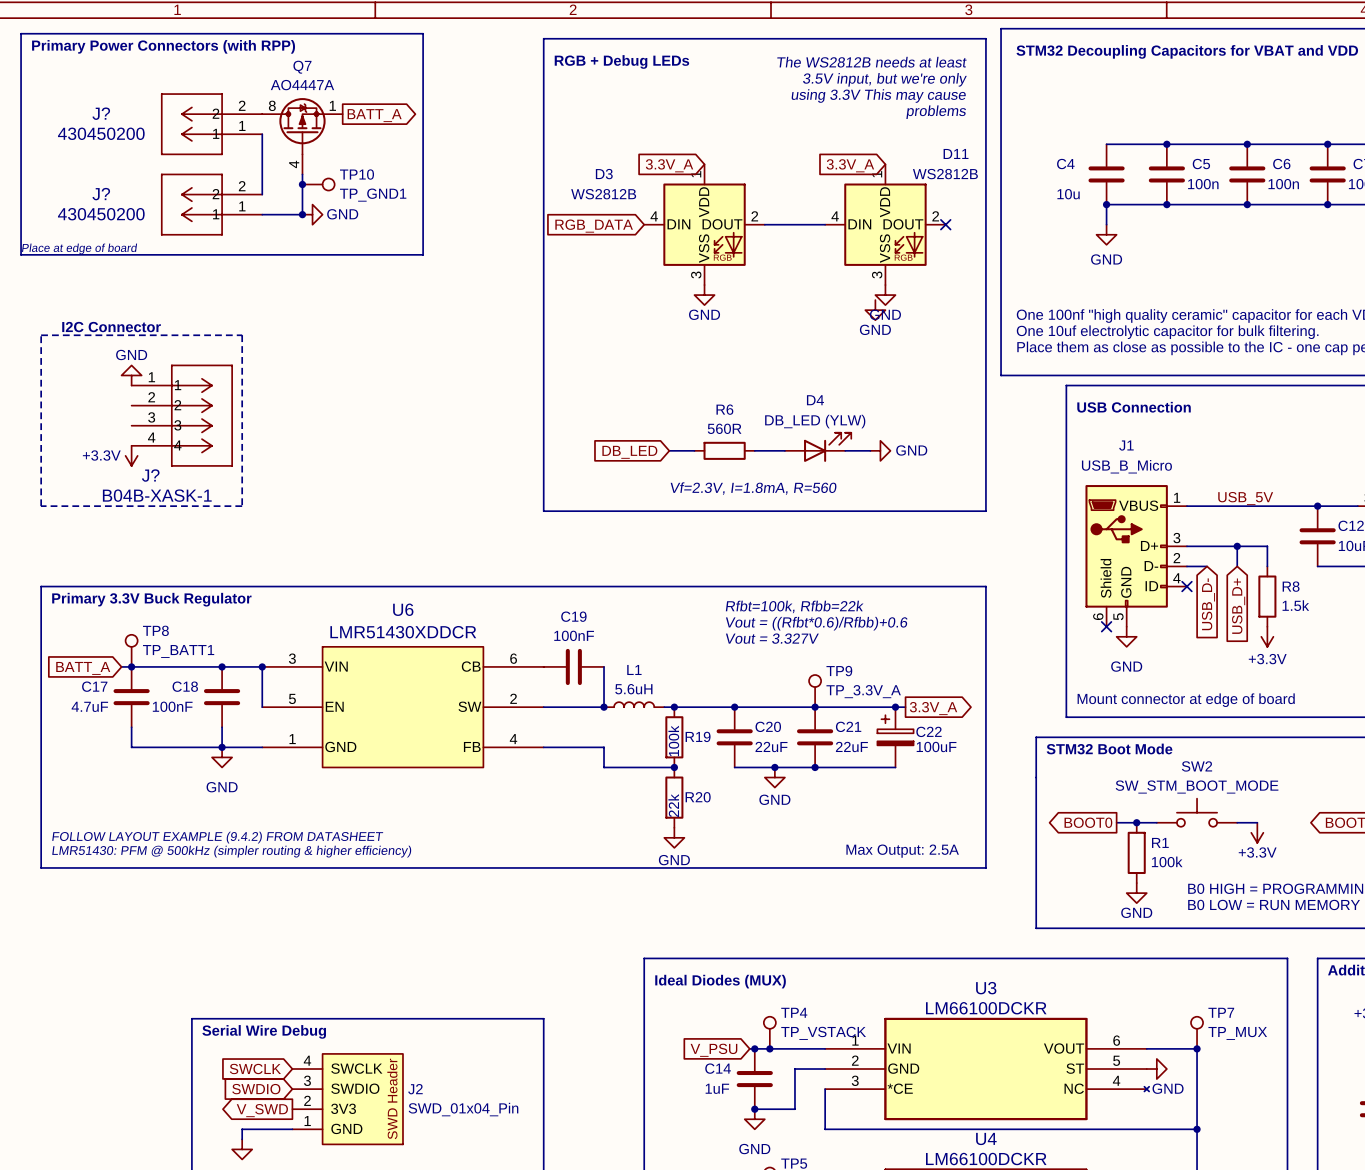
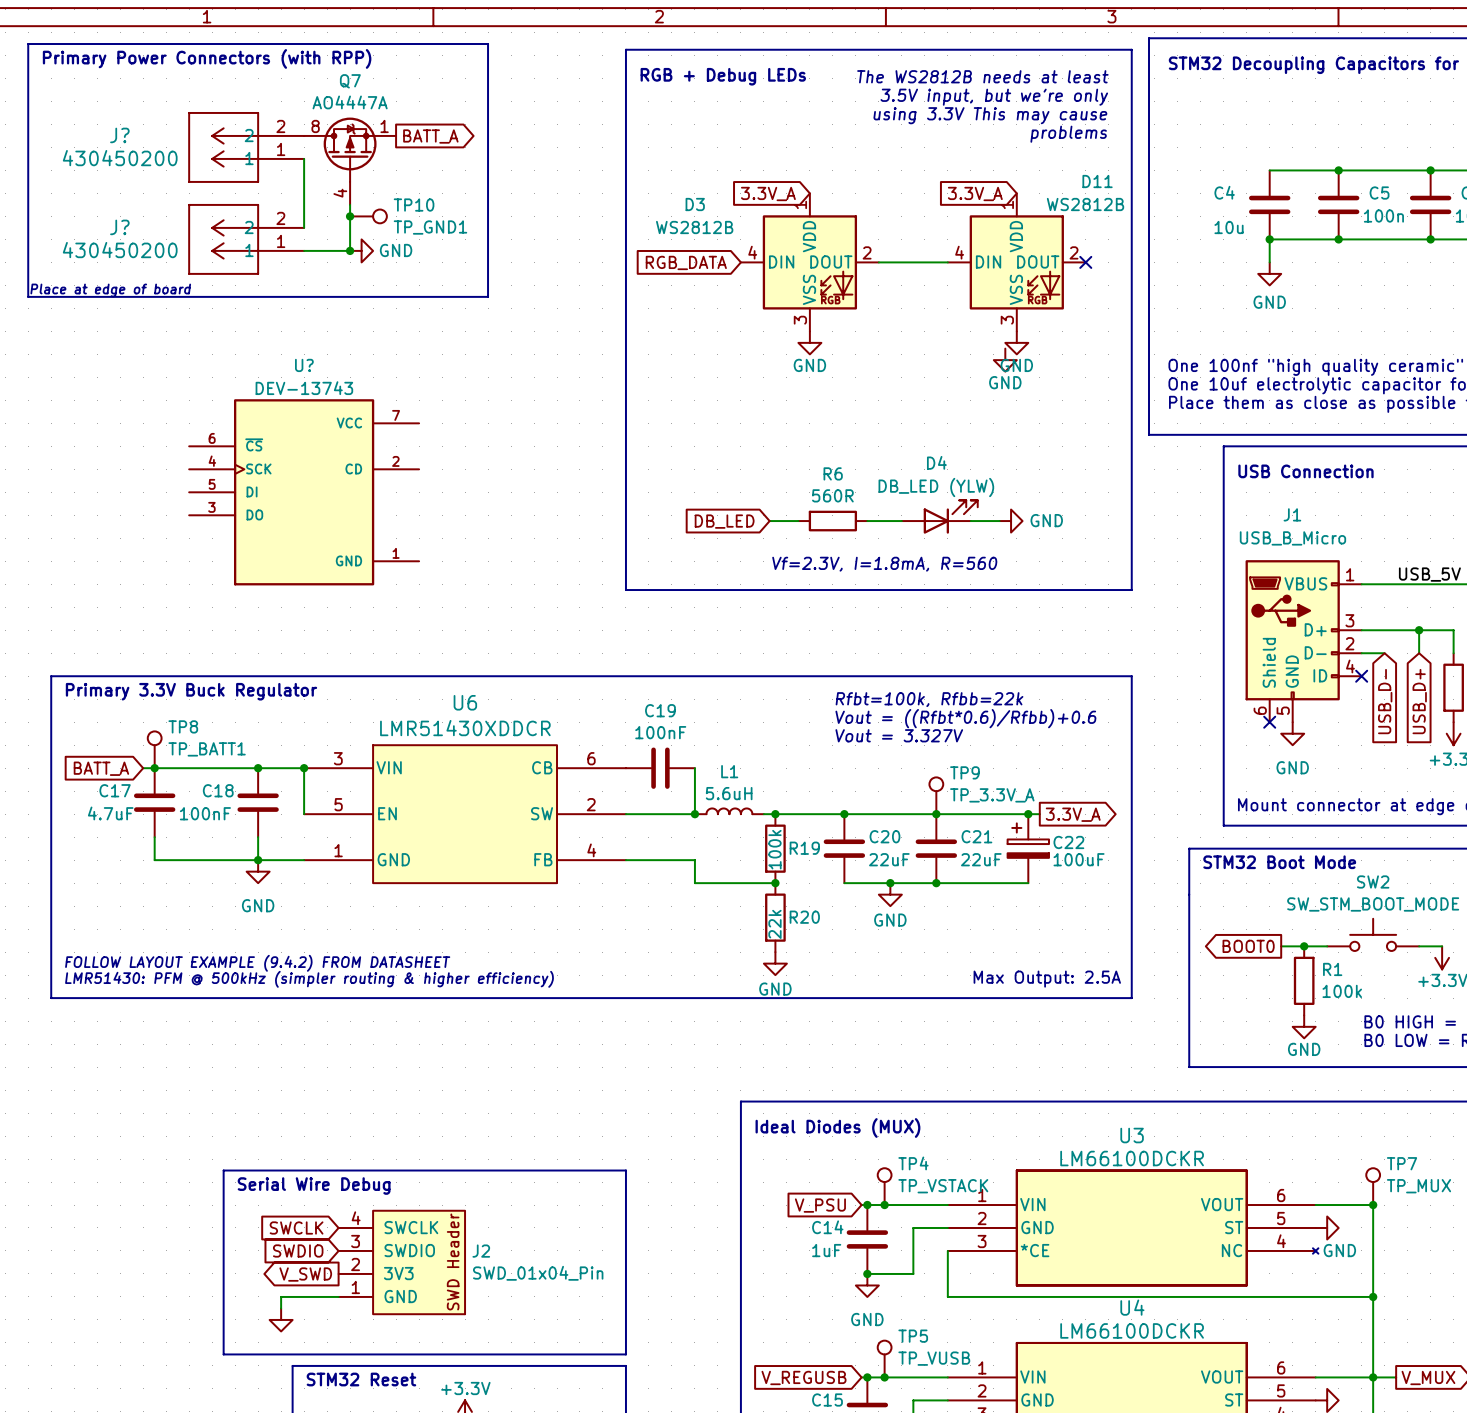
text: I2C Connector (111, 327) -> none
line: (41, 335) (242, 335) (242, 506) (41, 506) (41, 335) -> none
power symbol: GND (131, 375) -> none
J?: B04B-XASK-1 (182, 415) -> none
U?: none -> DEV-13743 (304, 492)
power symbol: +3.3V (131, 455) -> none

